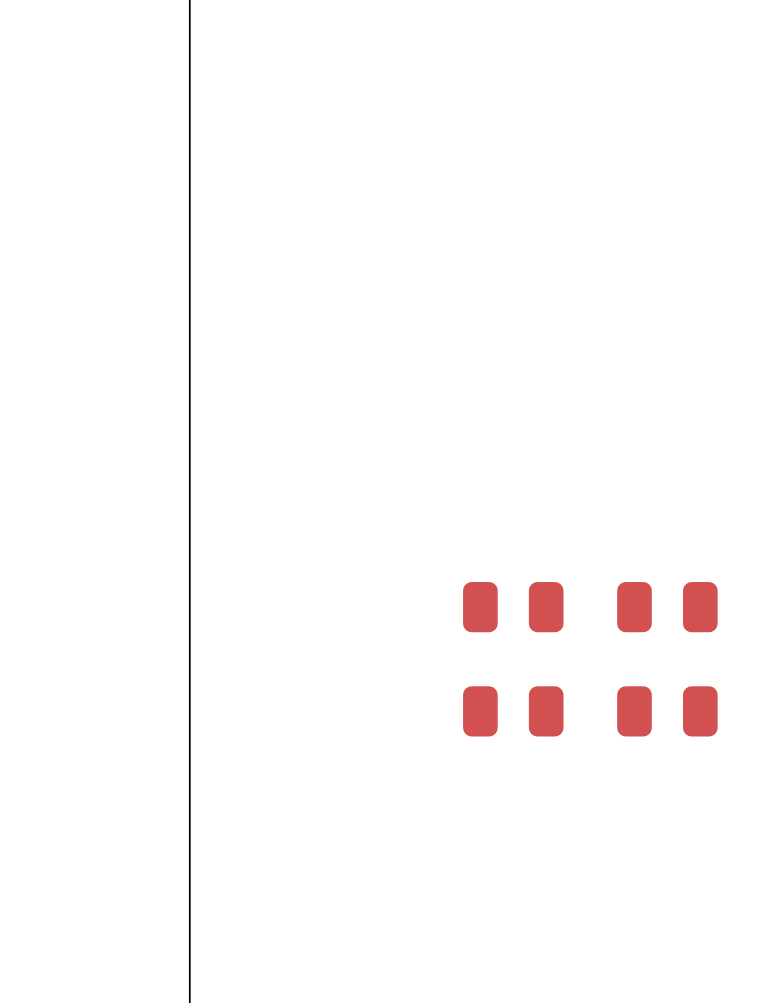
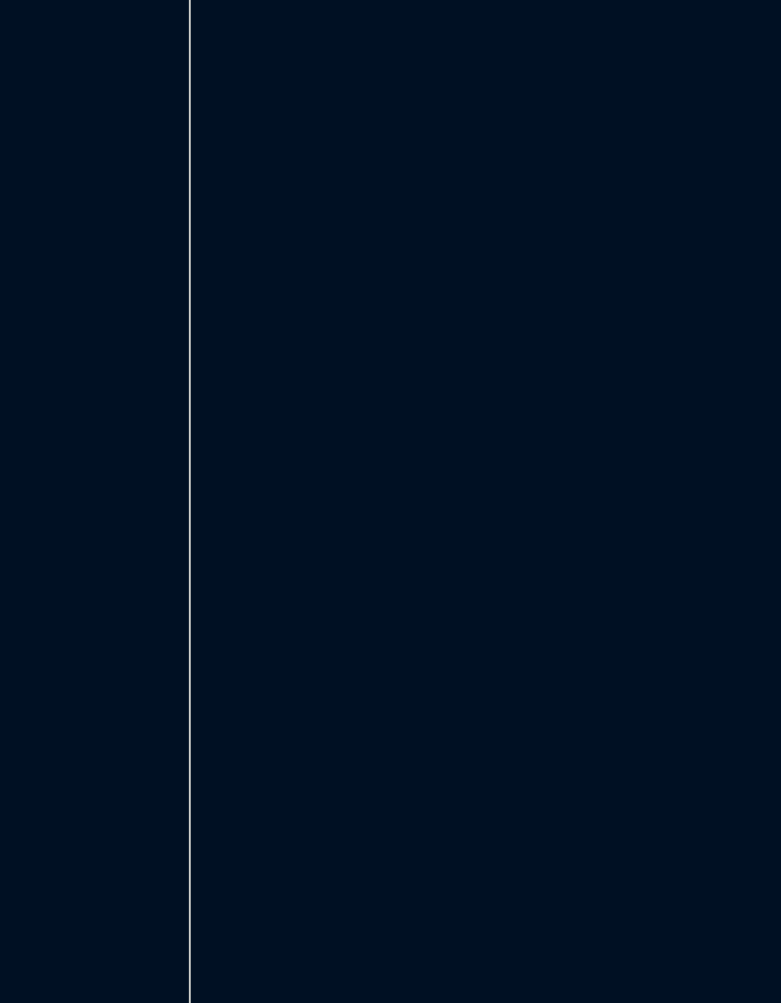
part: (513, 607) -> none
part: (667, 607) -> none
part: (513, 711) -> none
part: (667, 711) -> none

